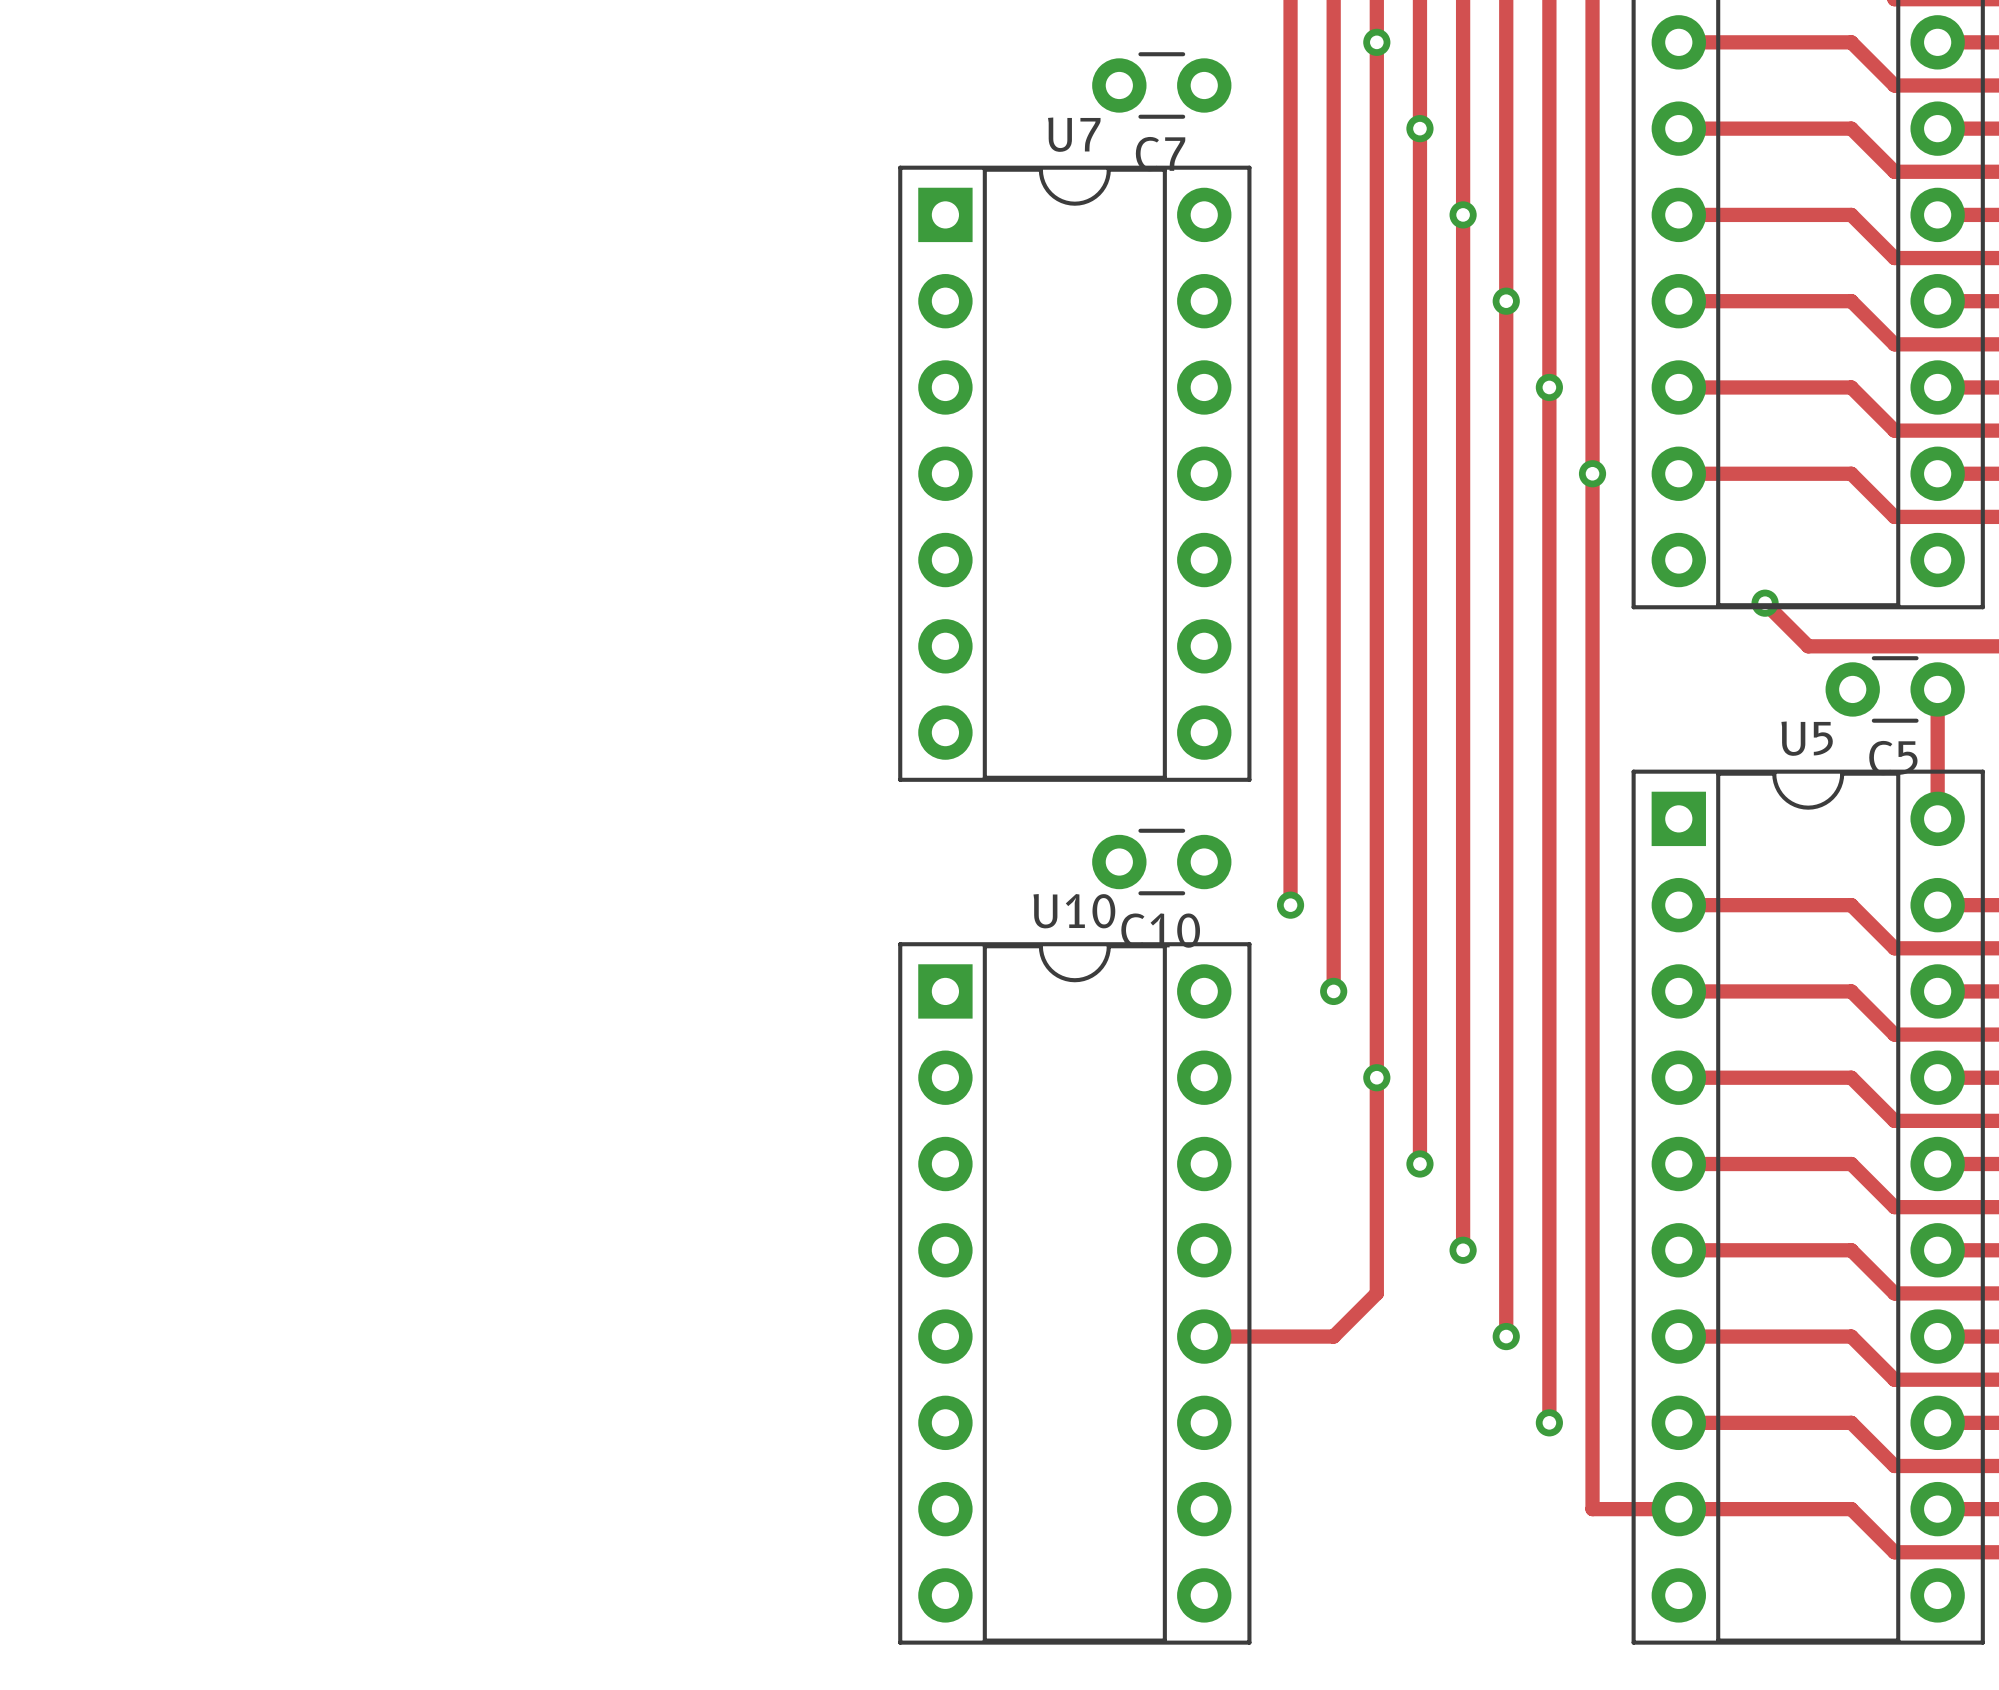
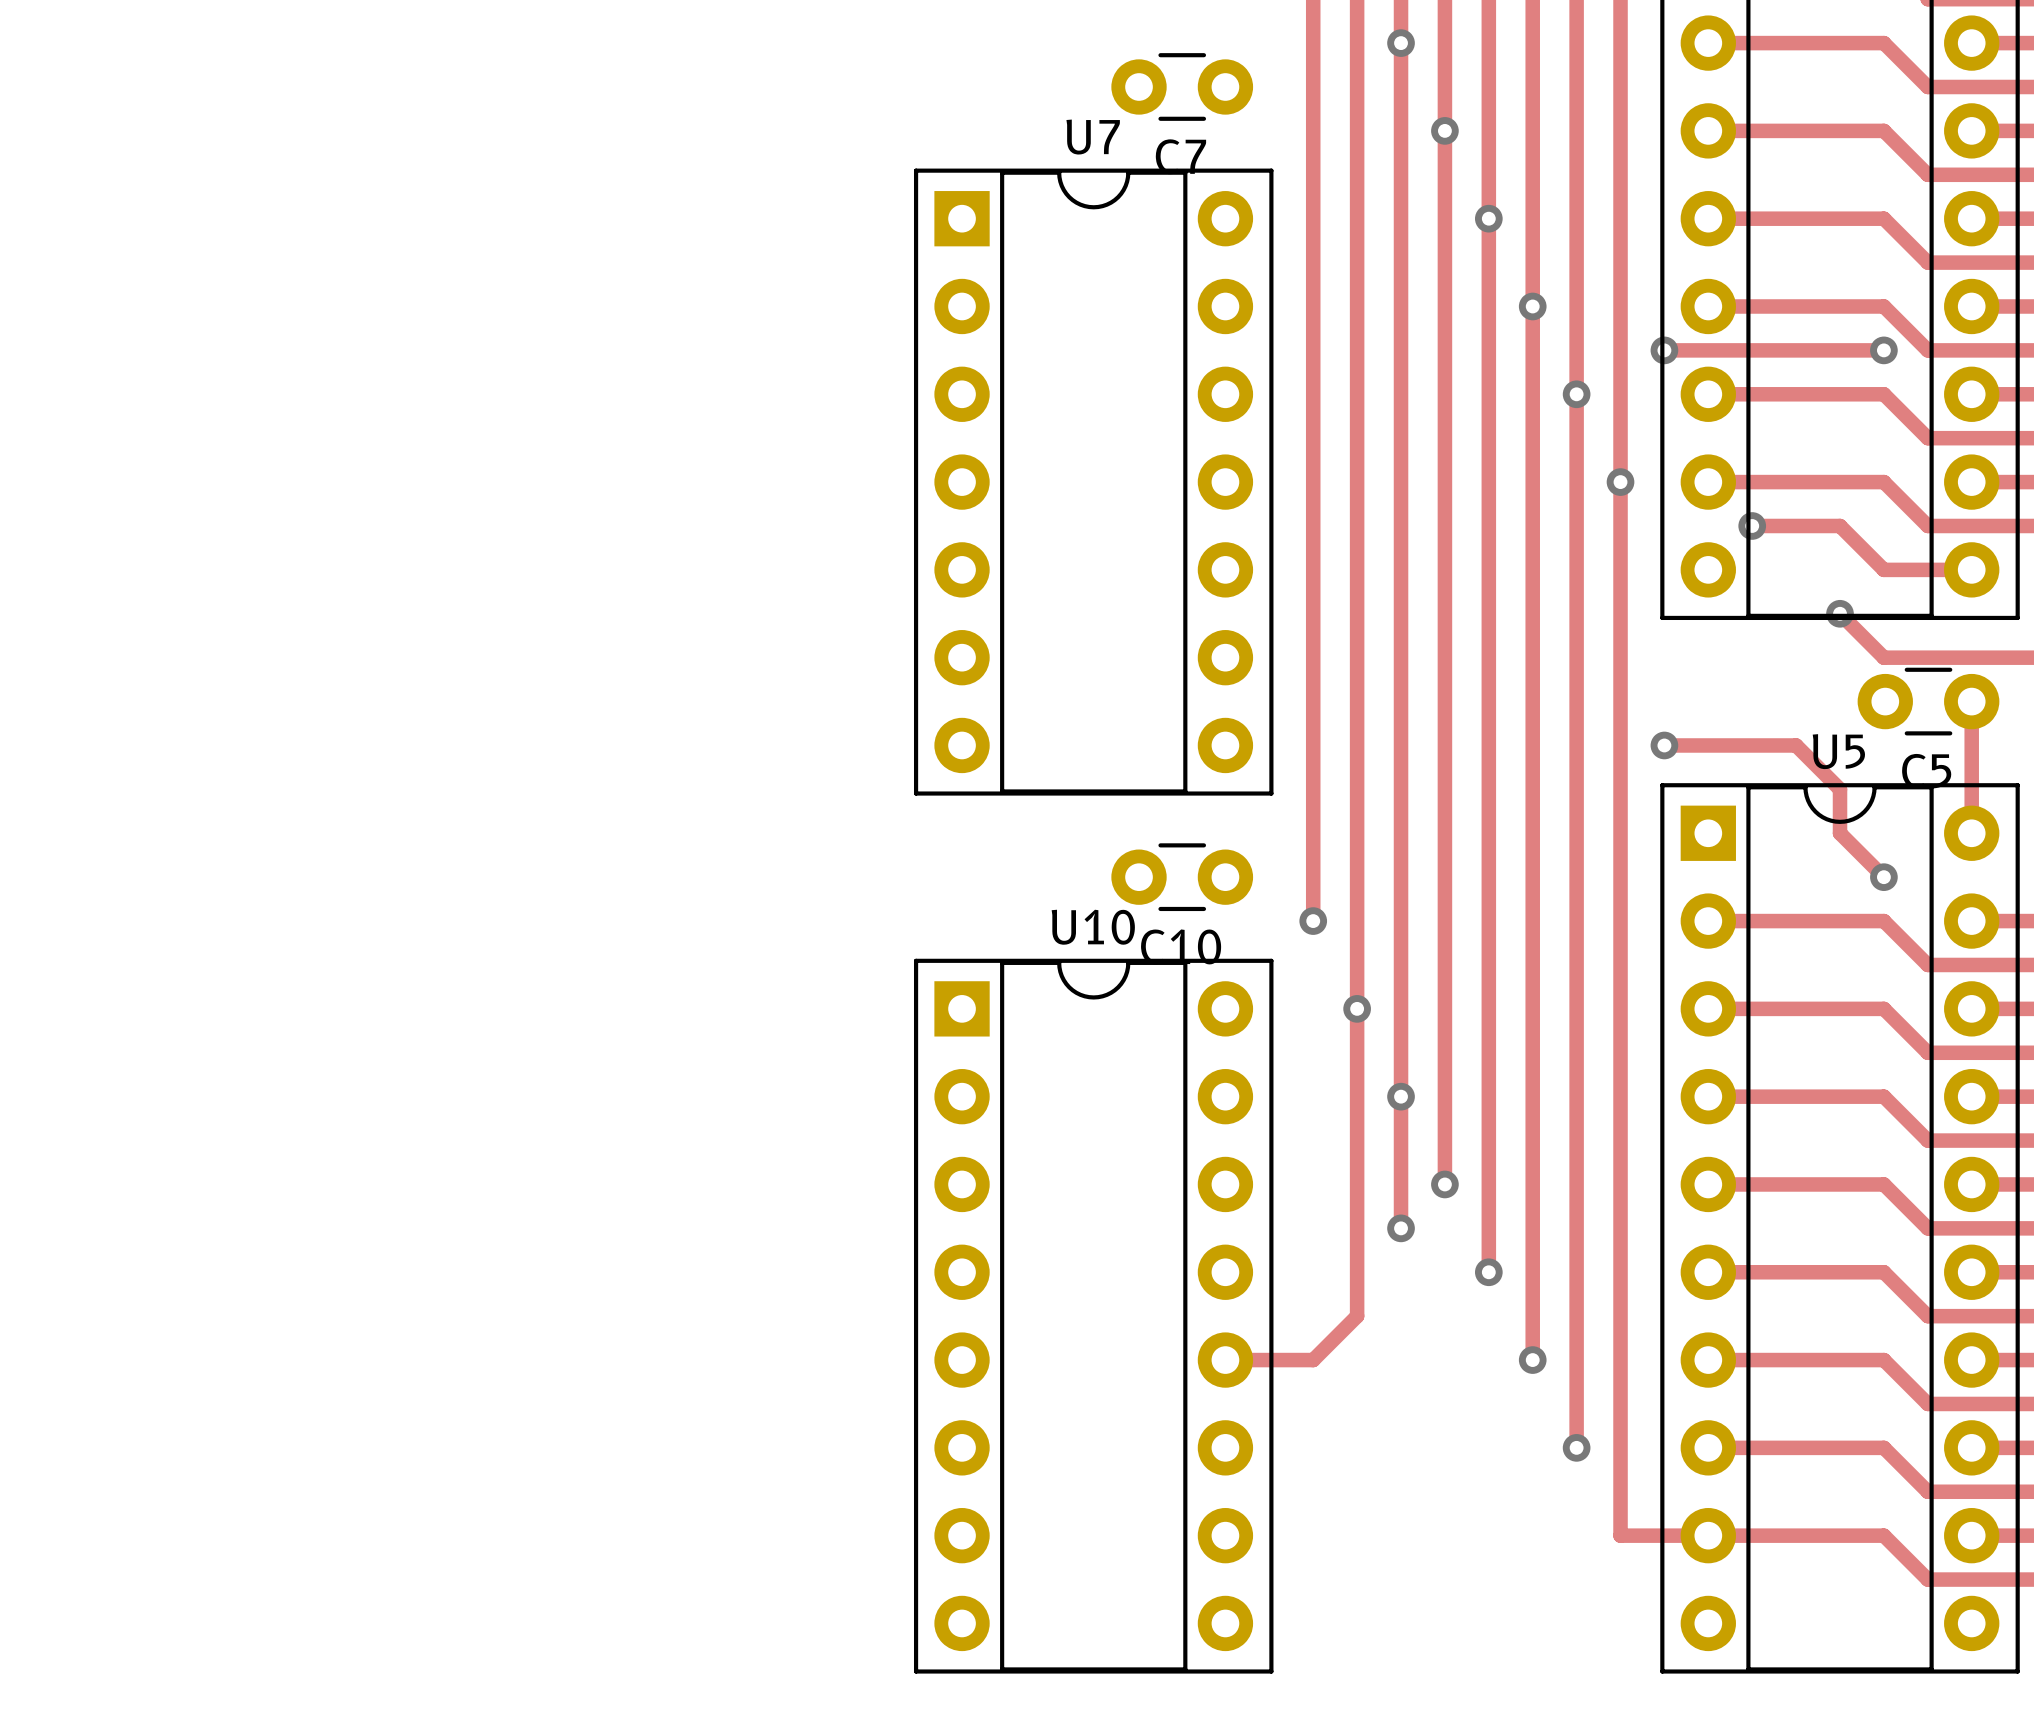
track: none -> (1664, 350) (1883, 350)
via: none -> (1664, 350)
via: none -> (1883, 350)
track: none -> (1752, 525) (1840, 525) (1883, 569) (1971, 569)
via: none -> (1752, 525)
track: (1765, 603) (1808, 646) (1851, 646) -> (1840, 613) (1883, 657)
via position: (1765, 603) -> (1840, 613)
track: none -> (1664, 745) (1796, 745) (1840, 789) (1840, 833) (1883, 877)
via: none -> (1664, 745)
via: none -> (1883, 877)
track: (1376, 1207) (1376, 1293) (1333, 1336) (1290, 1336) -> (1357, 1008) (1357, 1316) (1313, 1360)
via: none -> (1401, 1228)

